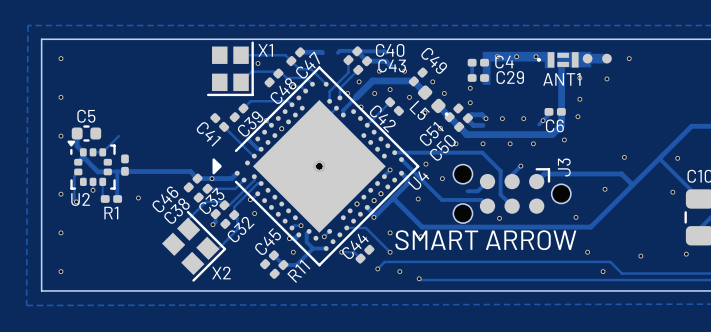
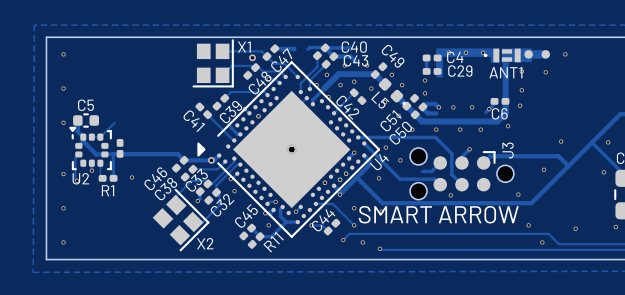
via: none -> (252, 57)
via: (257, 63) -> none
via: (212, 178) -> none
via: none -> (211, 160)

